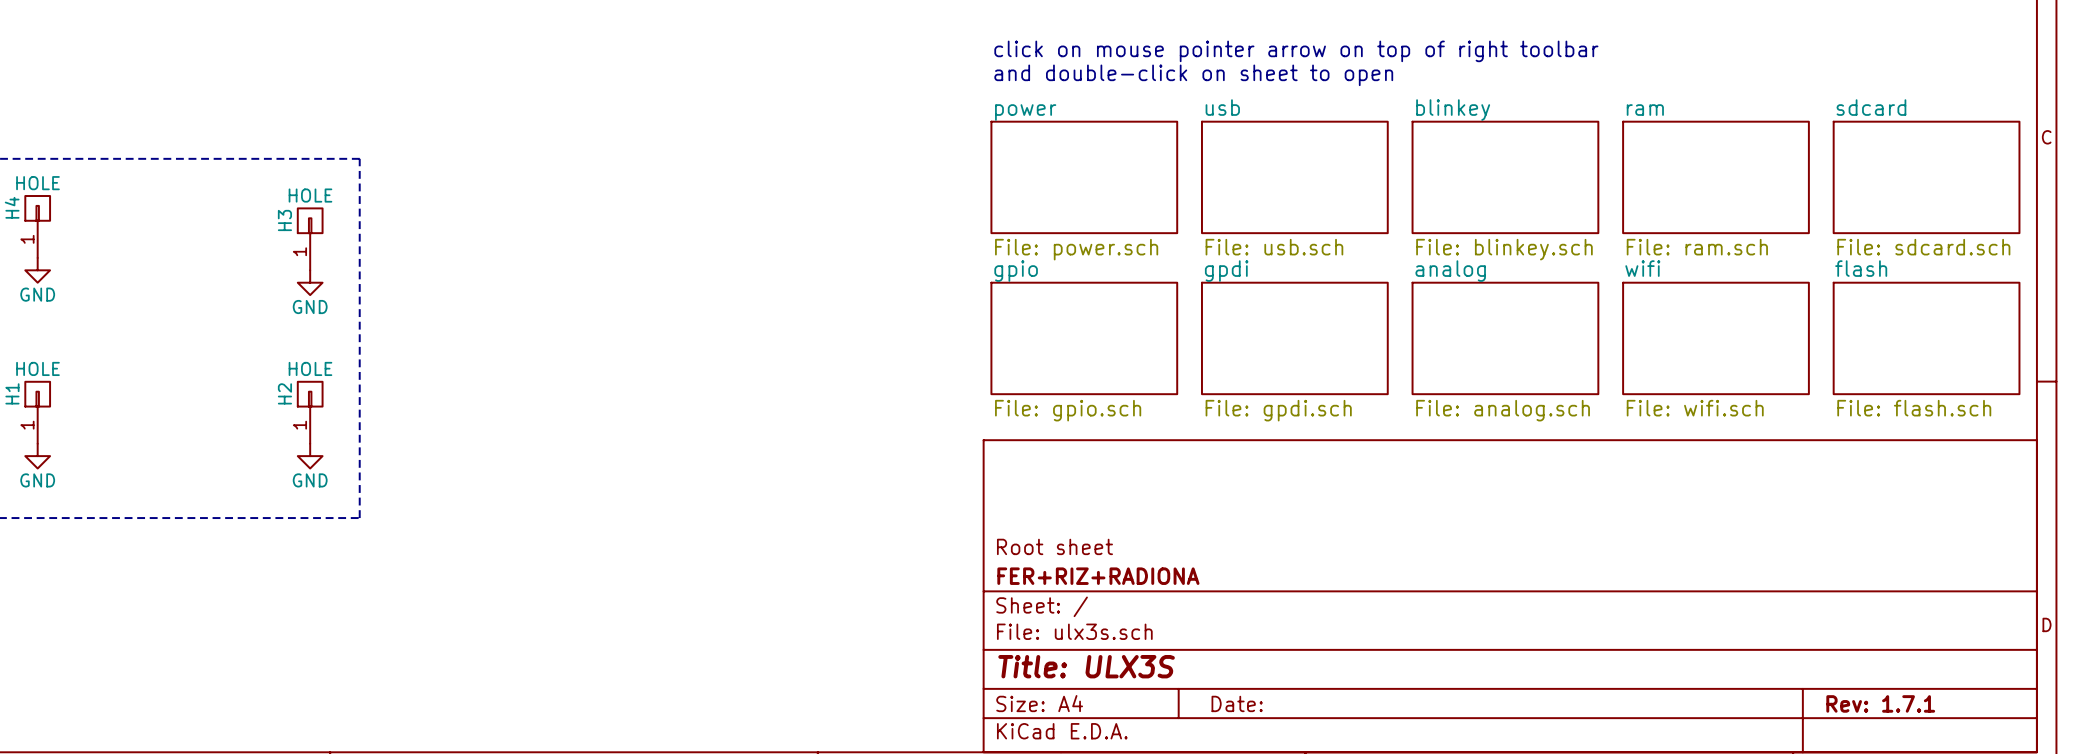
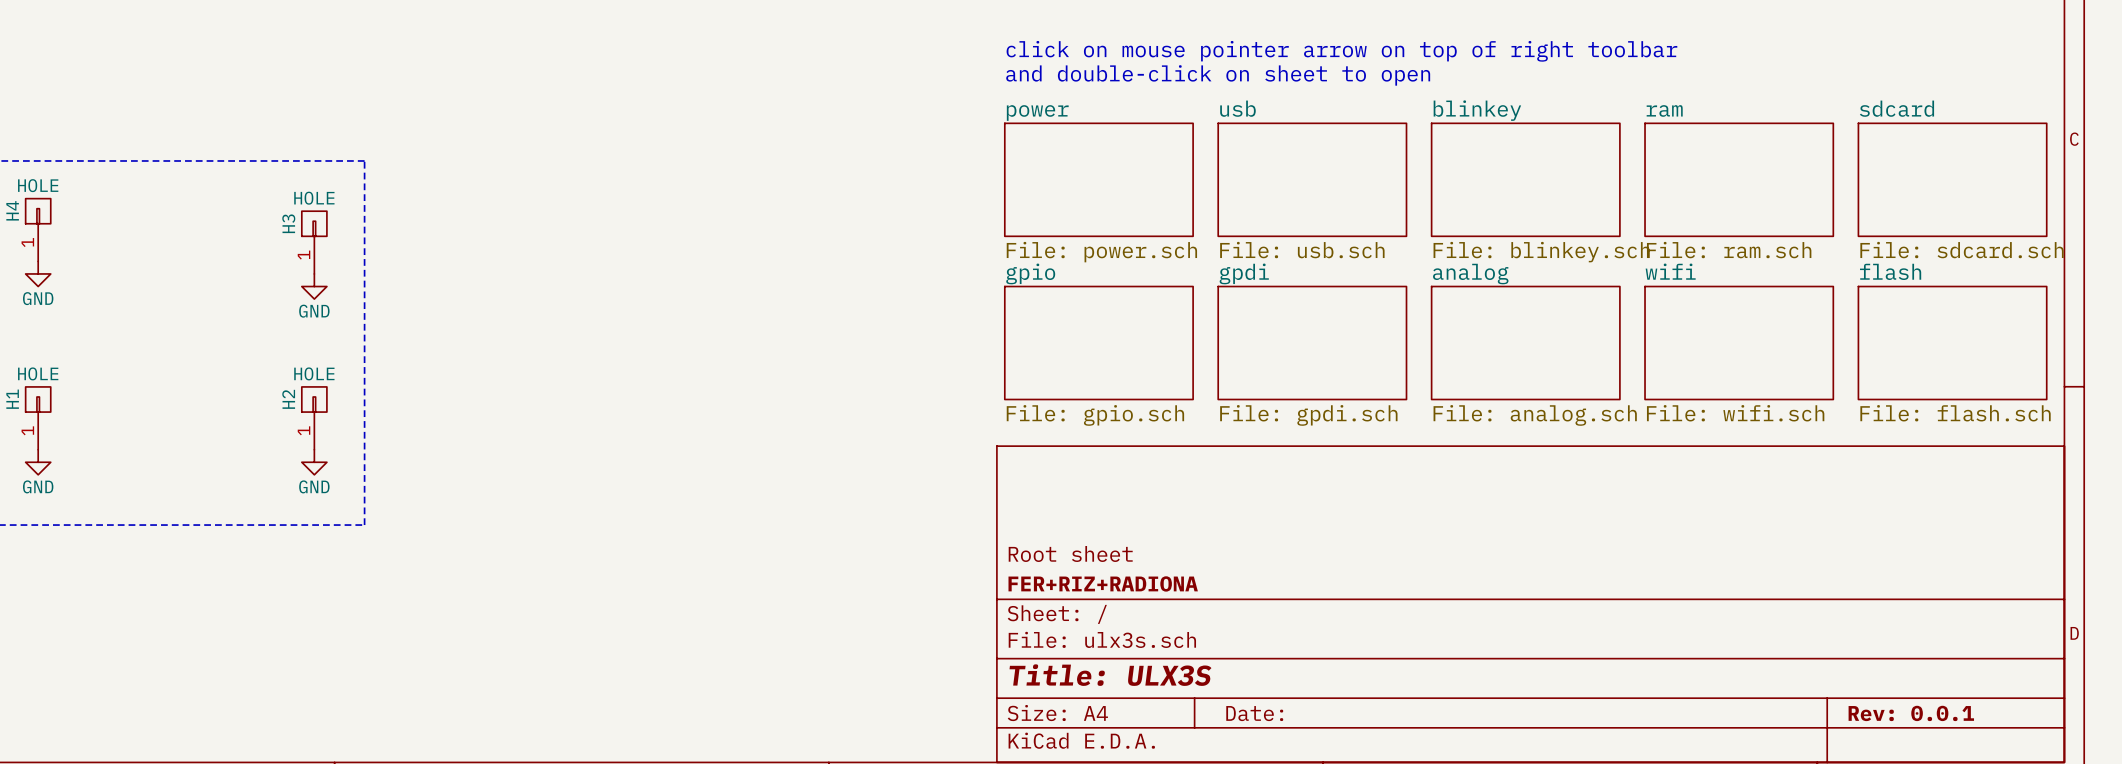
title block: Rev: 1.7.1 (1880, 703) -> Rev: 0.0.1 (1911, 713)

